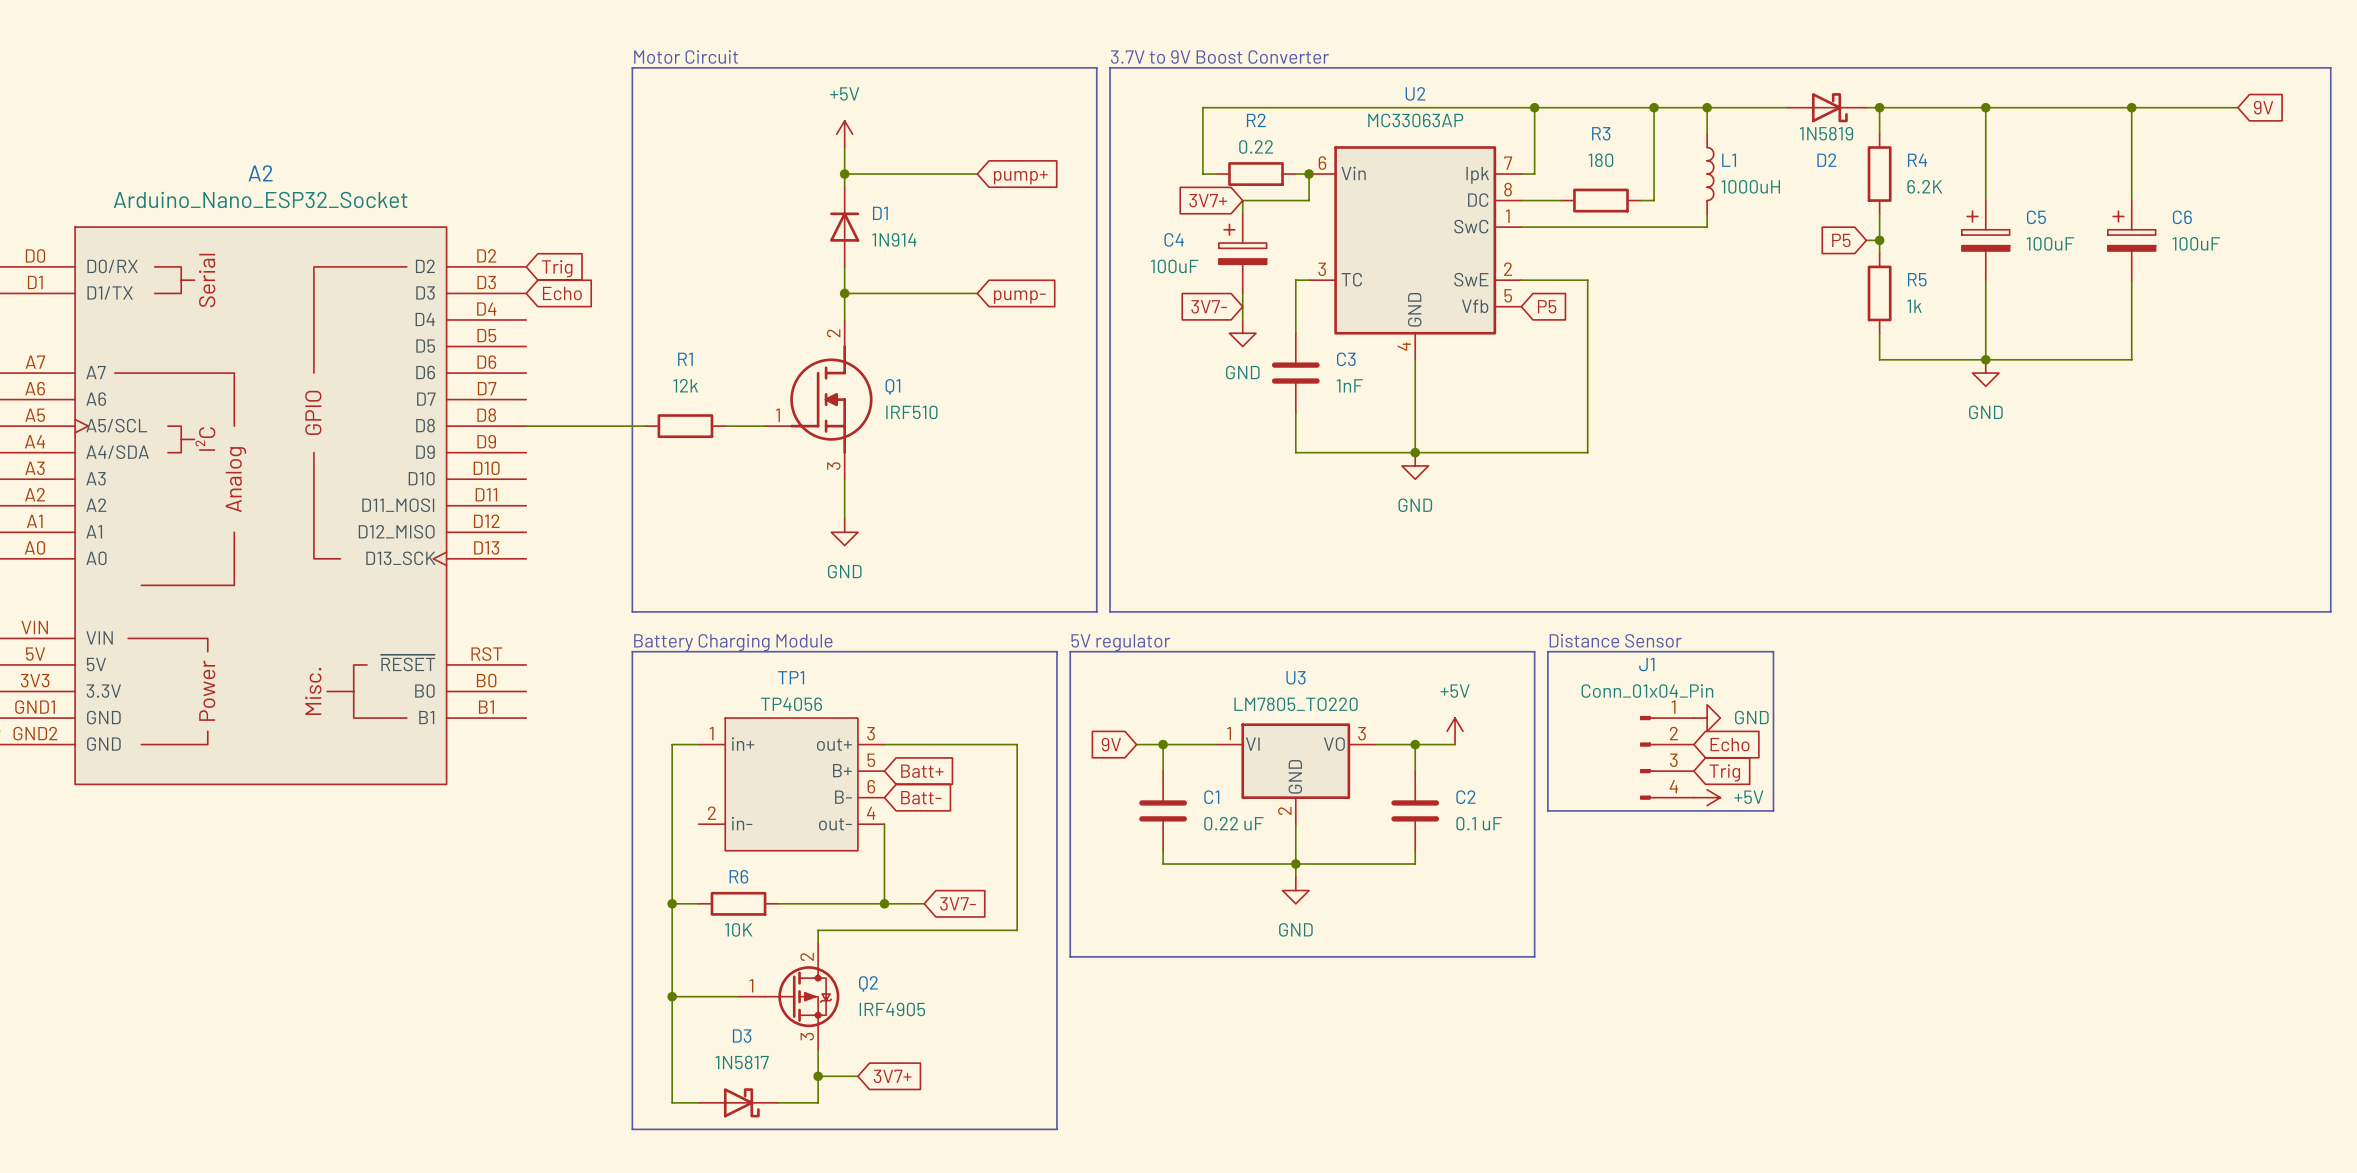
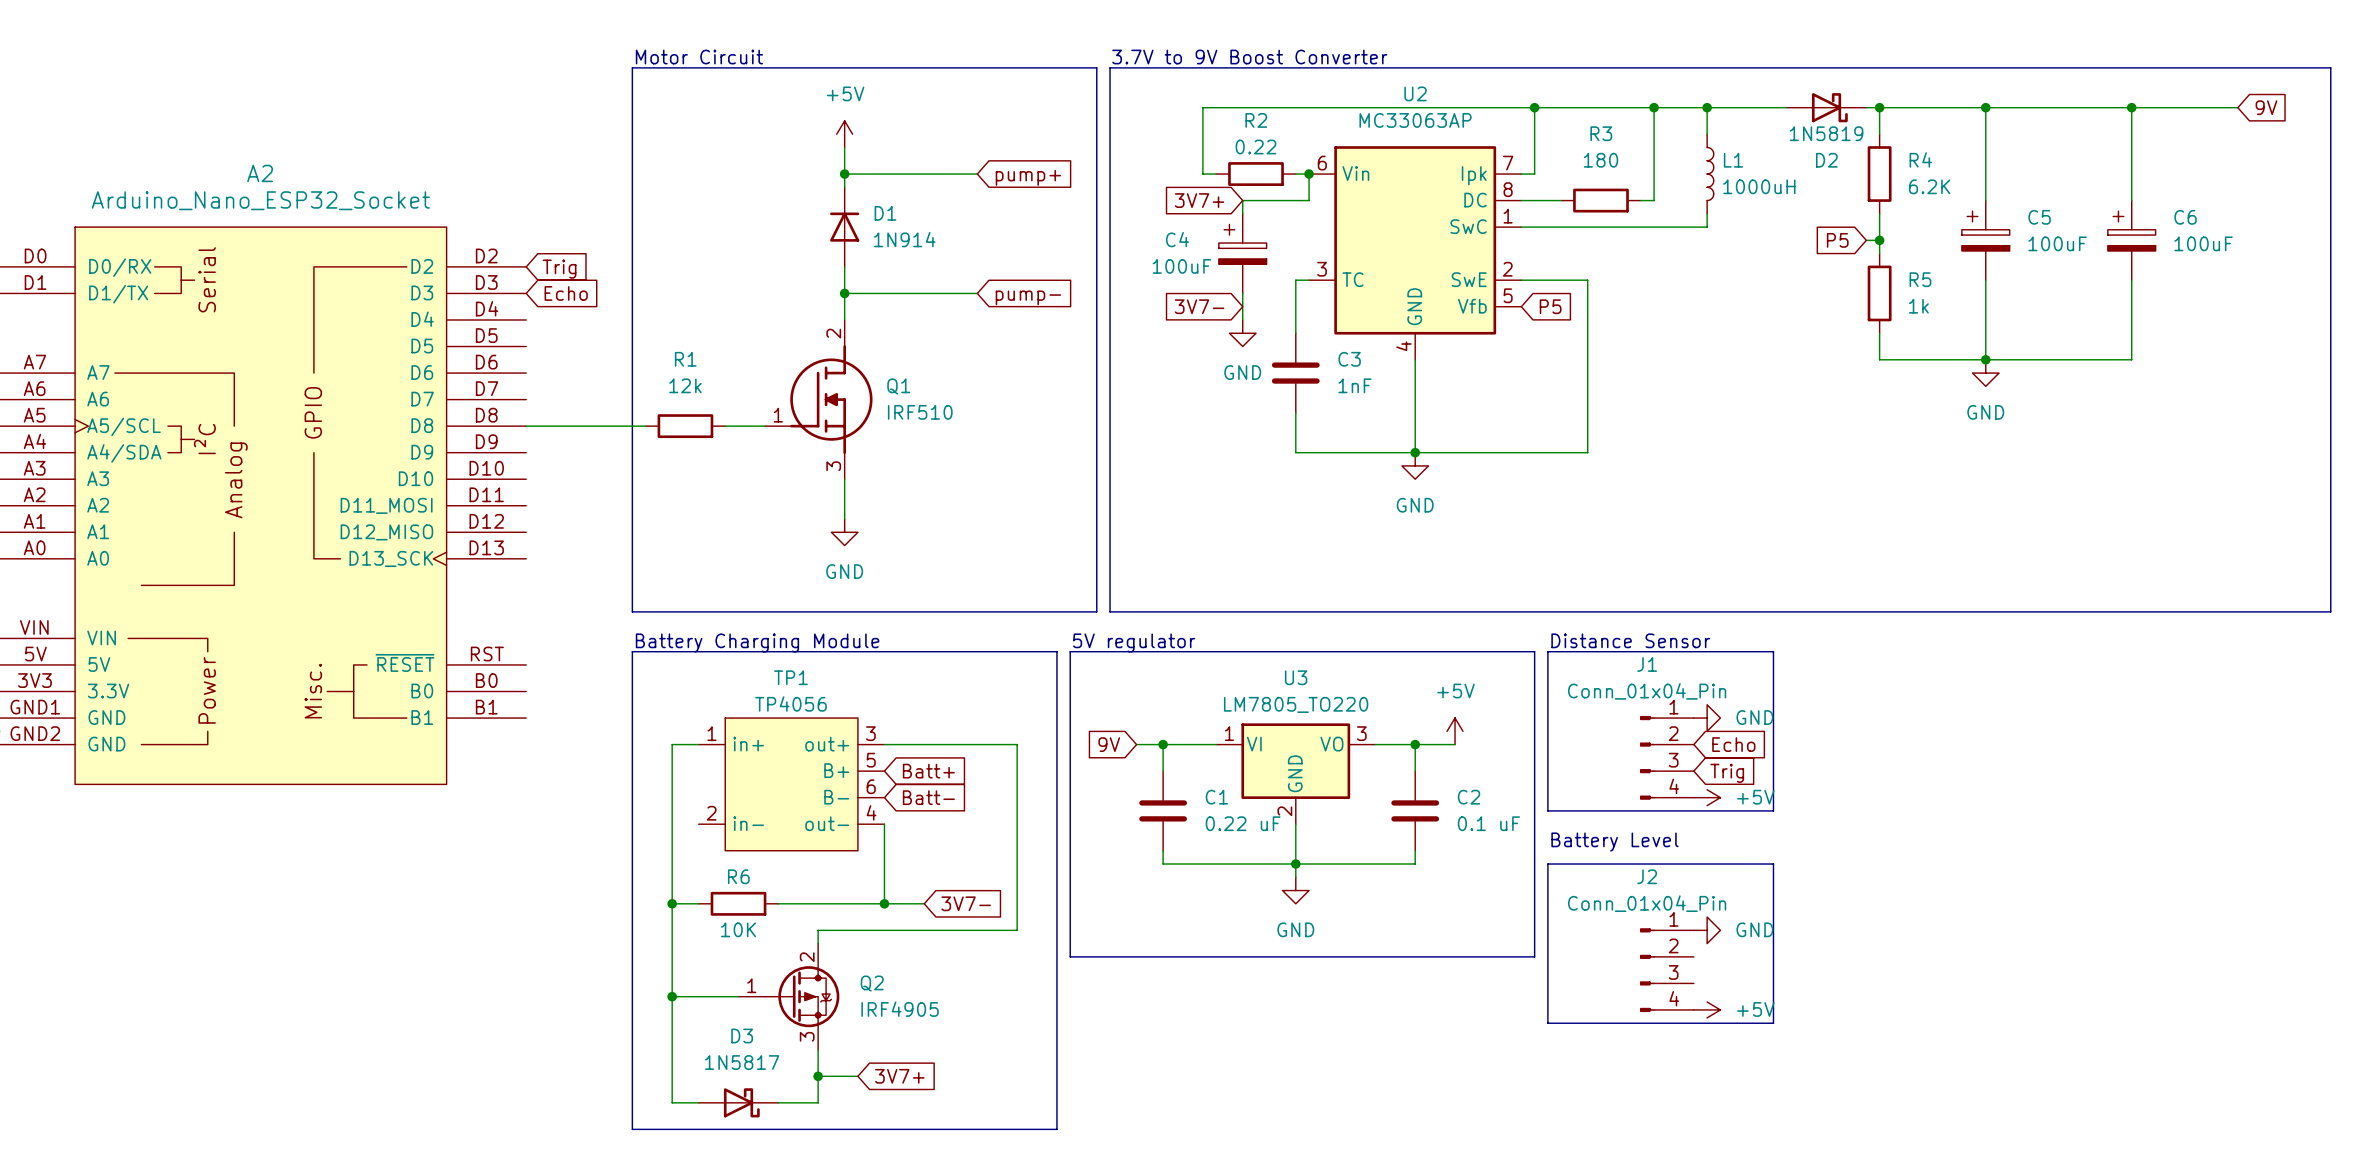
text: none -> Battery Level (1614, 842)
line: none -> (1547, 864) (1773, 864) (1773, 1023) (1547, 1023) (1547, 864)
power symbol: none -> GND (1707, 930)
J2: none -> Conn_01x04_Pin (1666, 970)
power symbol: none -> +5V (1707, 1009)

